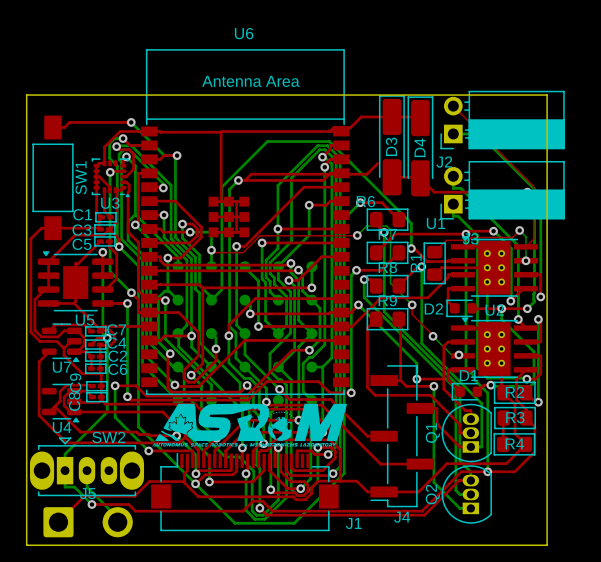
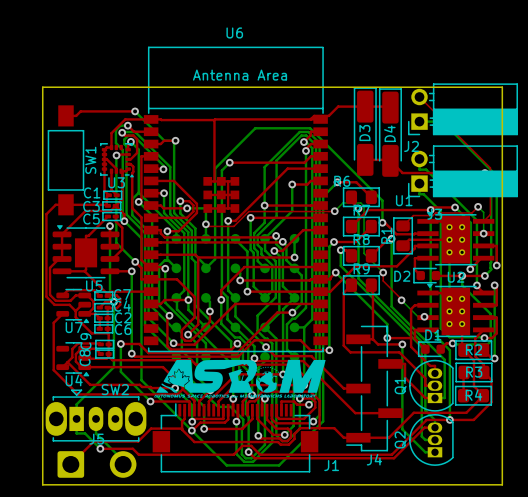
top track: (377, 163) (367, 174) (251, 174) (244, 180) -> none

